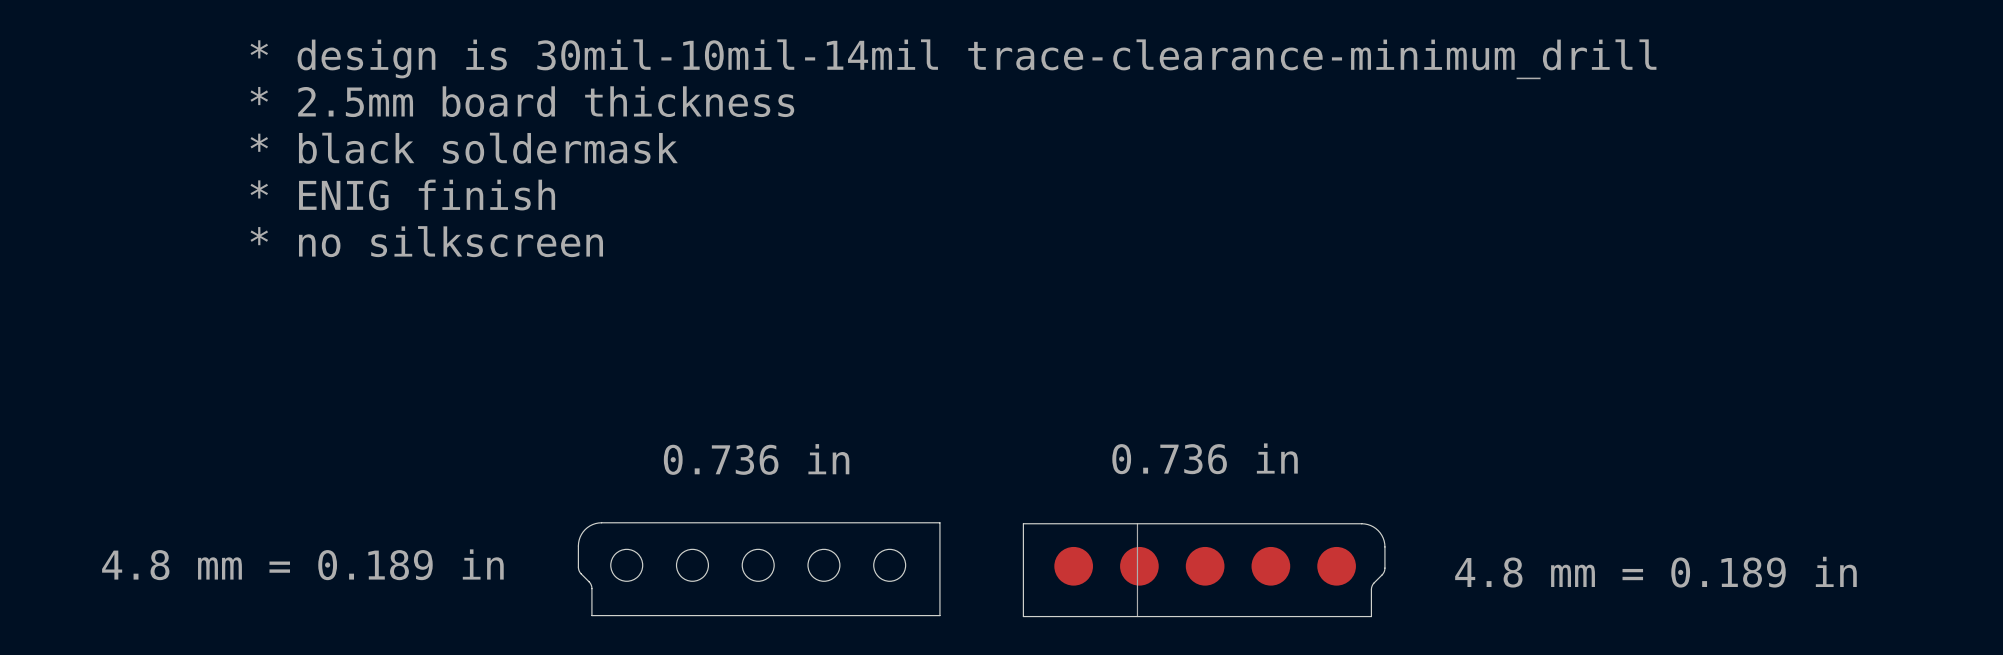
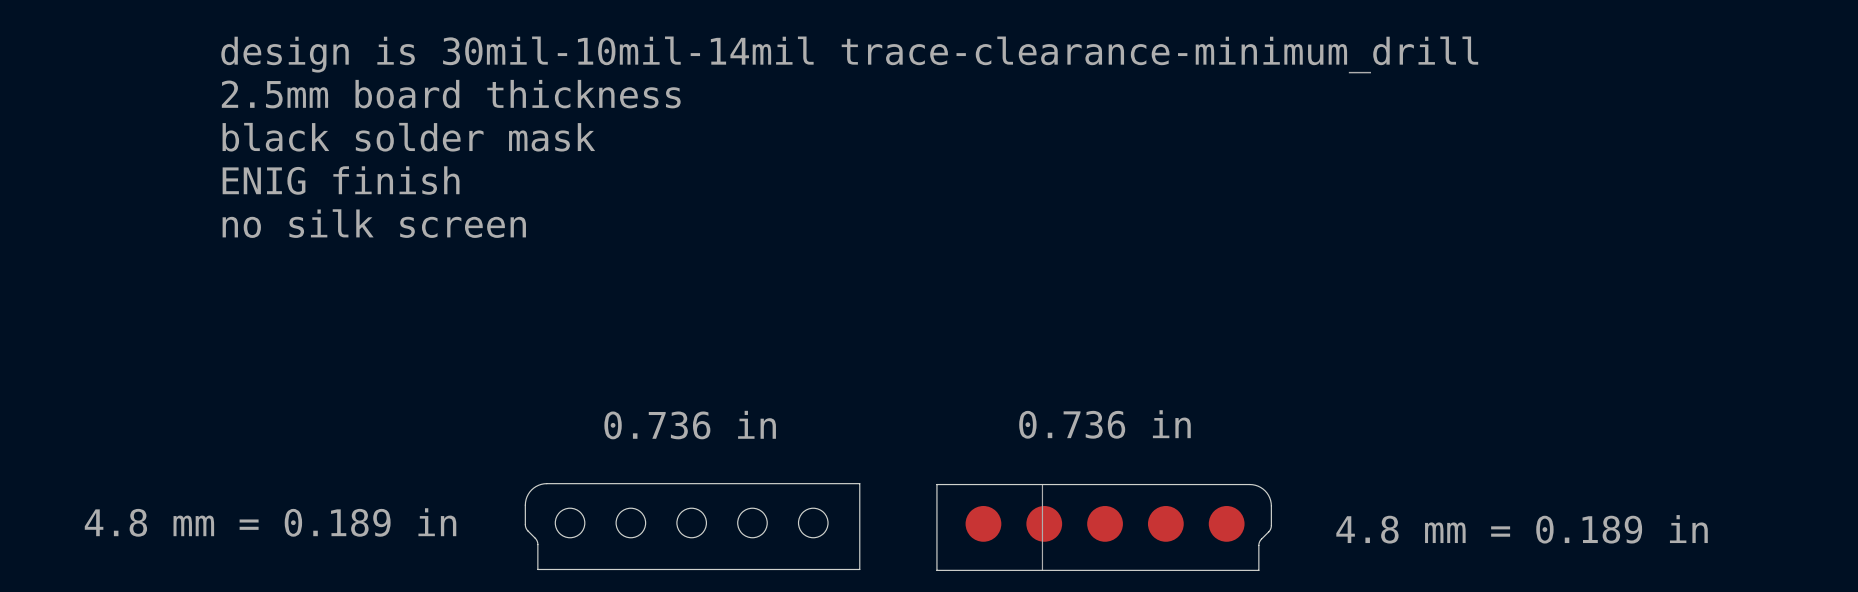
text: * design is 30mil-10mil-14mil trace-clearance-minimum_drill (953, 59) -> design is 30mil-10mil-14mil trace-clearance-minimum_drill (849, 54)
text: * 2.5mm board thickness (522, 101) -> 2.5mm board thickness (451, 94)
text: * black soldermask (464, 148) -> black solder mask (408, 137)
text: * ENIG finish (402, 195) -> ENIG finish (341, 180)
text: * no silkscreen (426, 241) -> no silk screen (374, 223)

